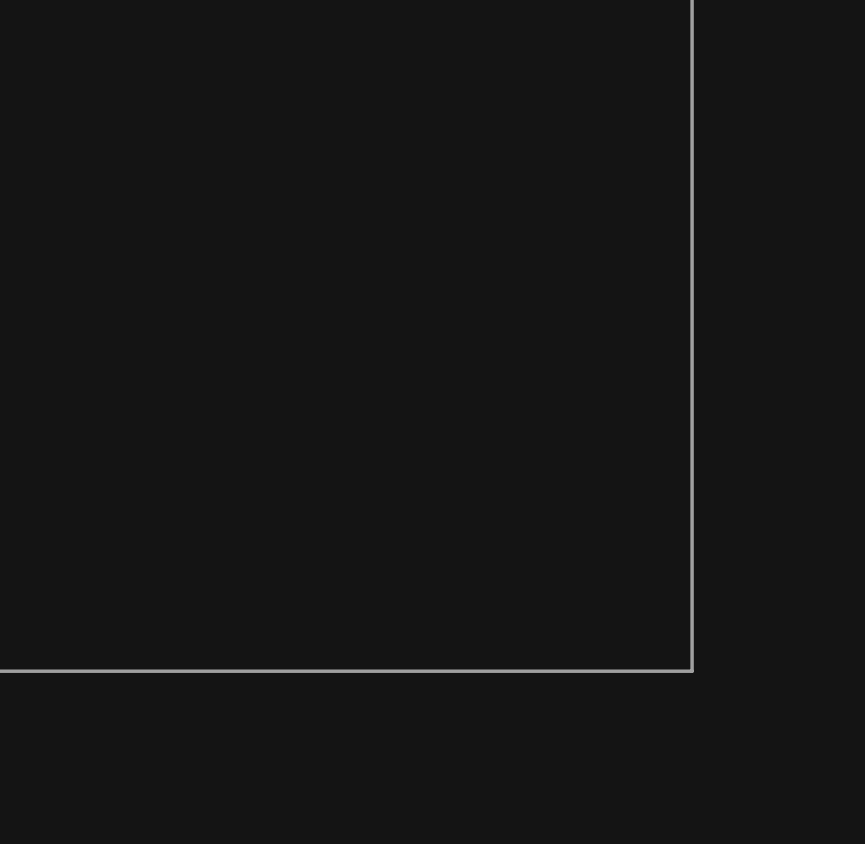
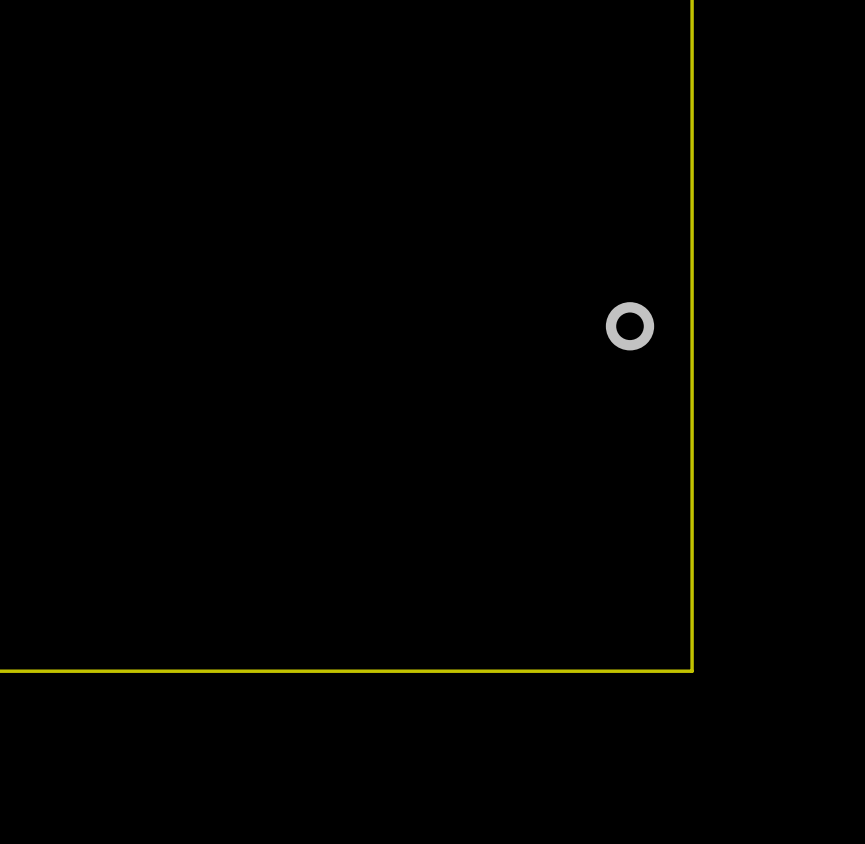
via: none -> (630, 326)

